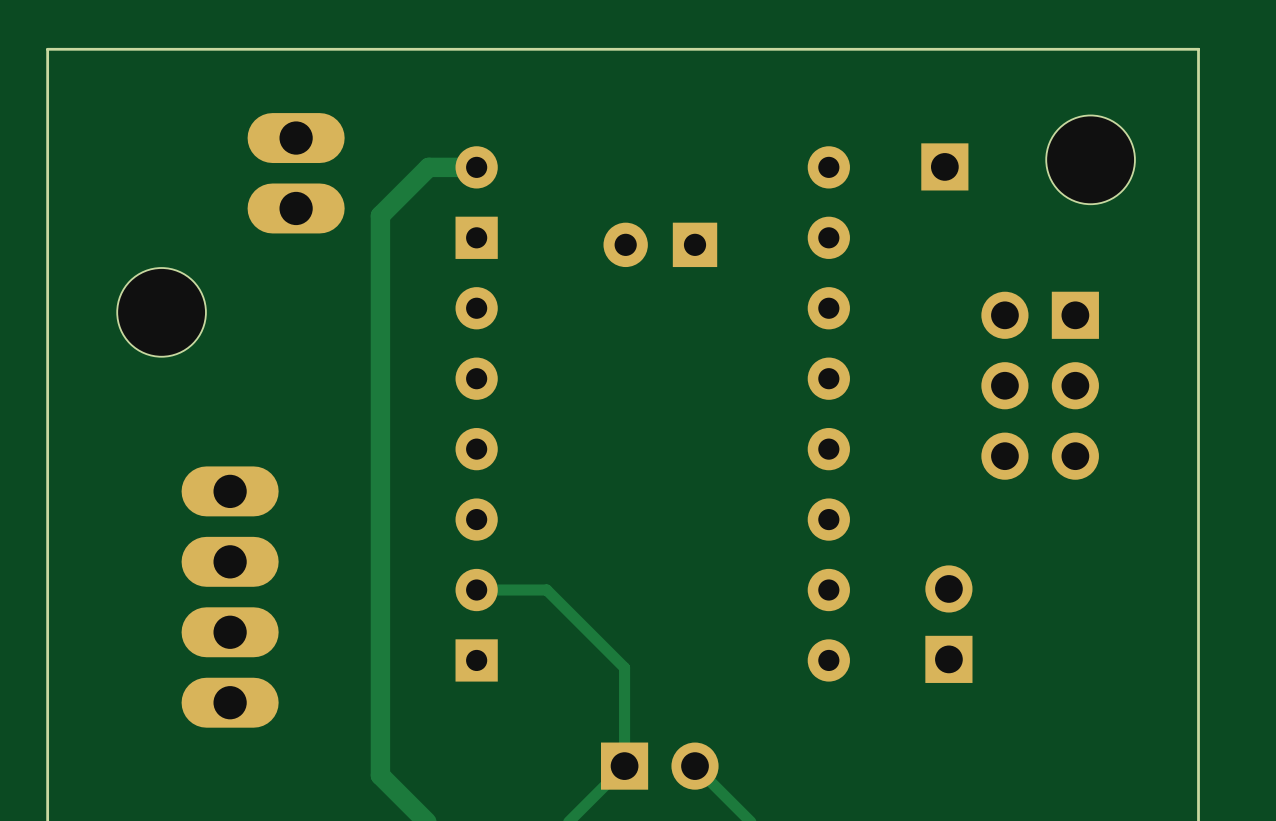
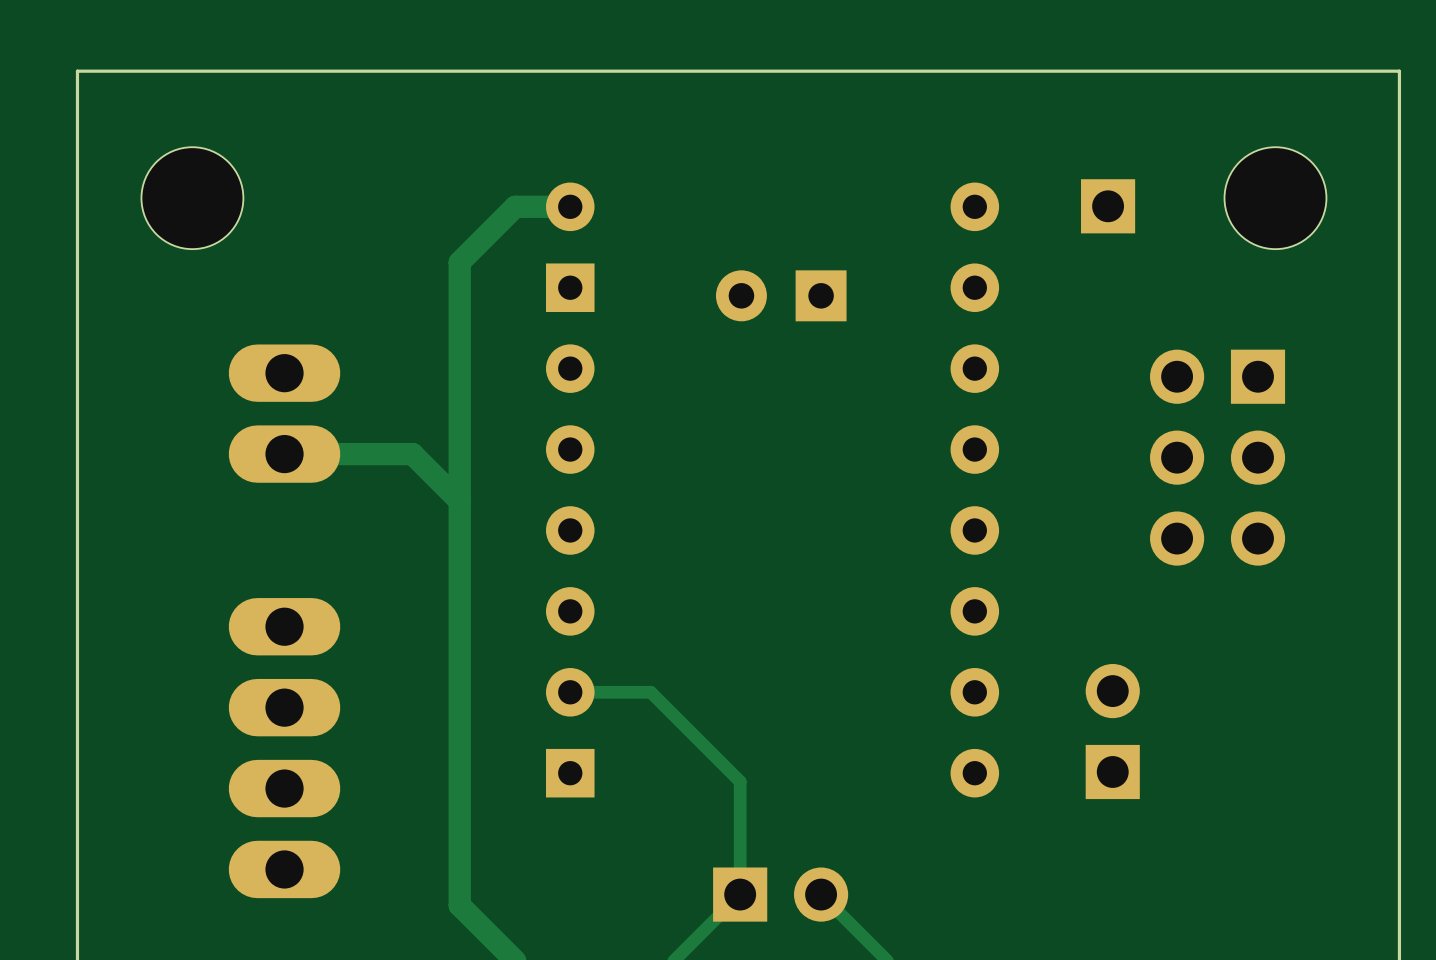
part position: (296, 173) -> (284, 413)
part position: (161, 312) -> (192, 198)
track: none -> (284, 454) (412, 454) (459, 501)
part position: (230, 597) -> (284, 748)

